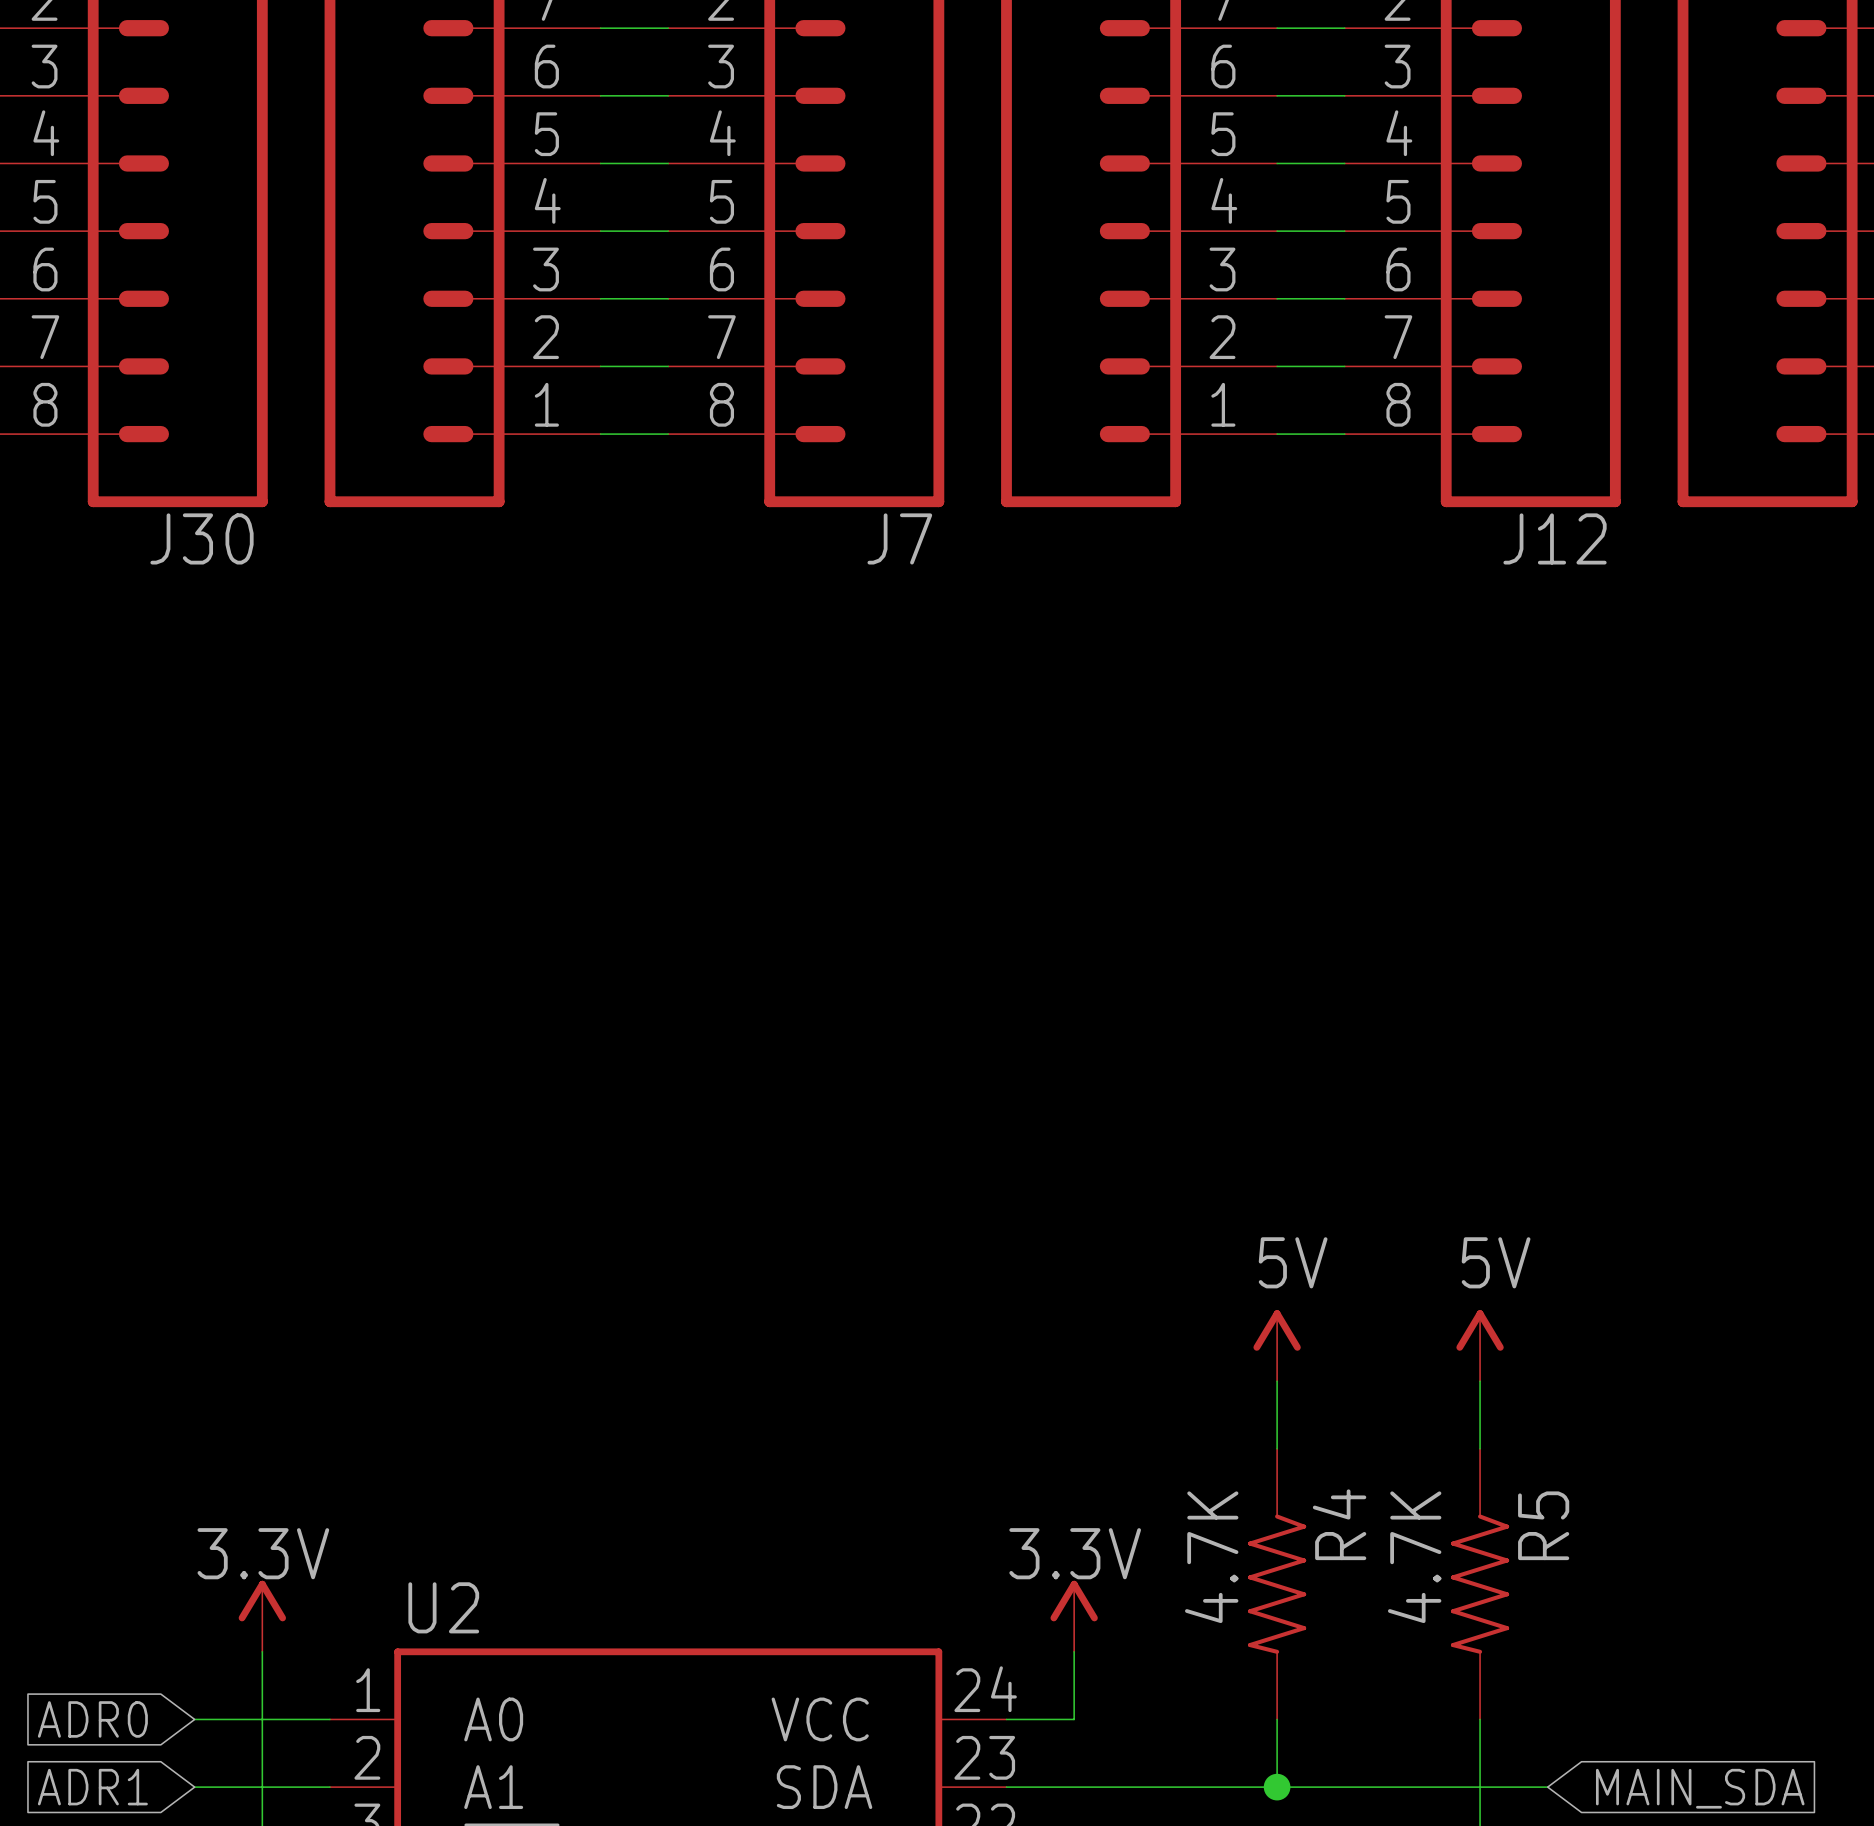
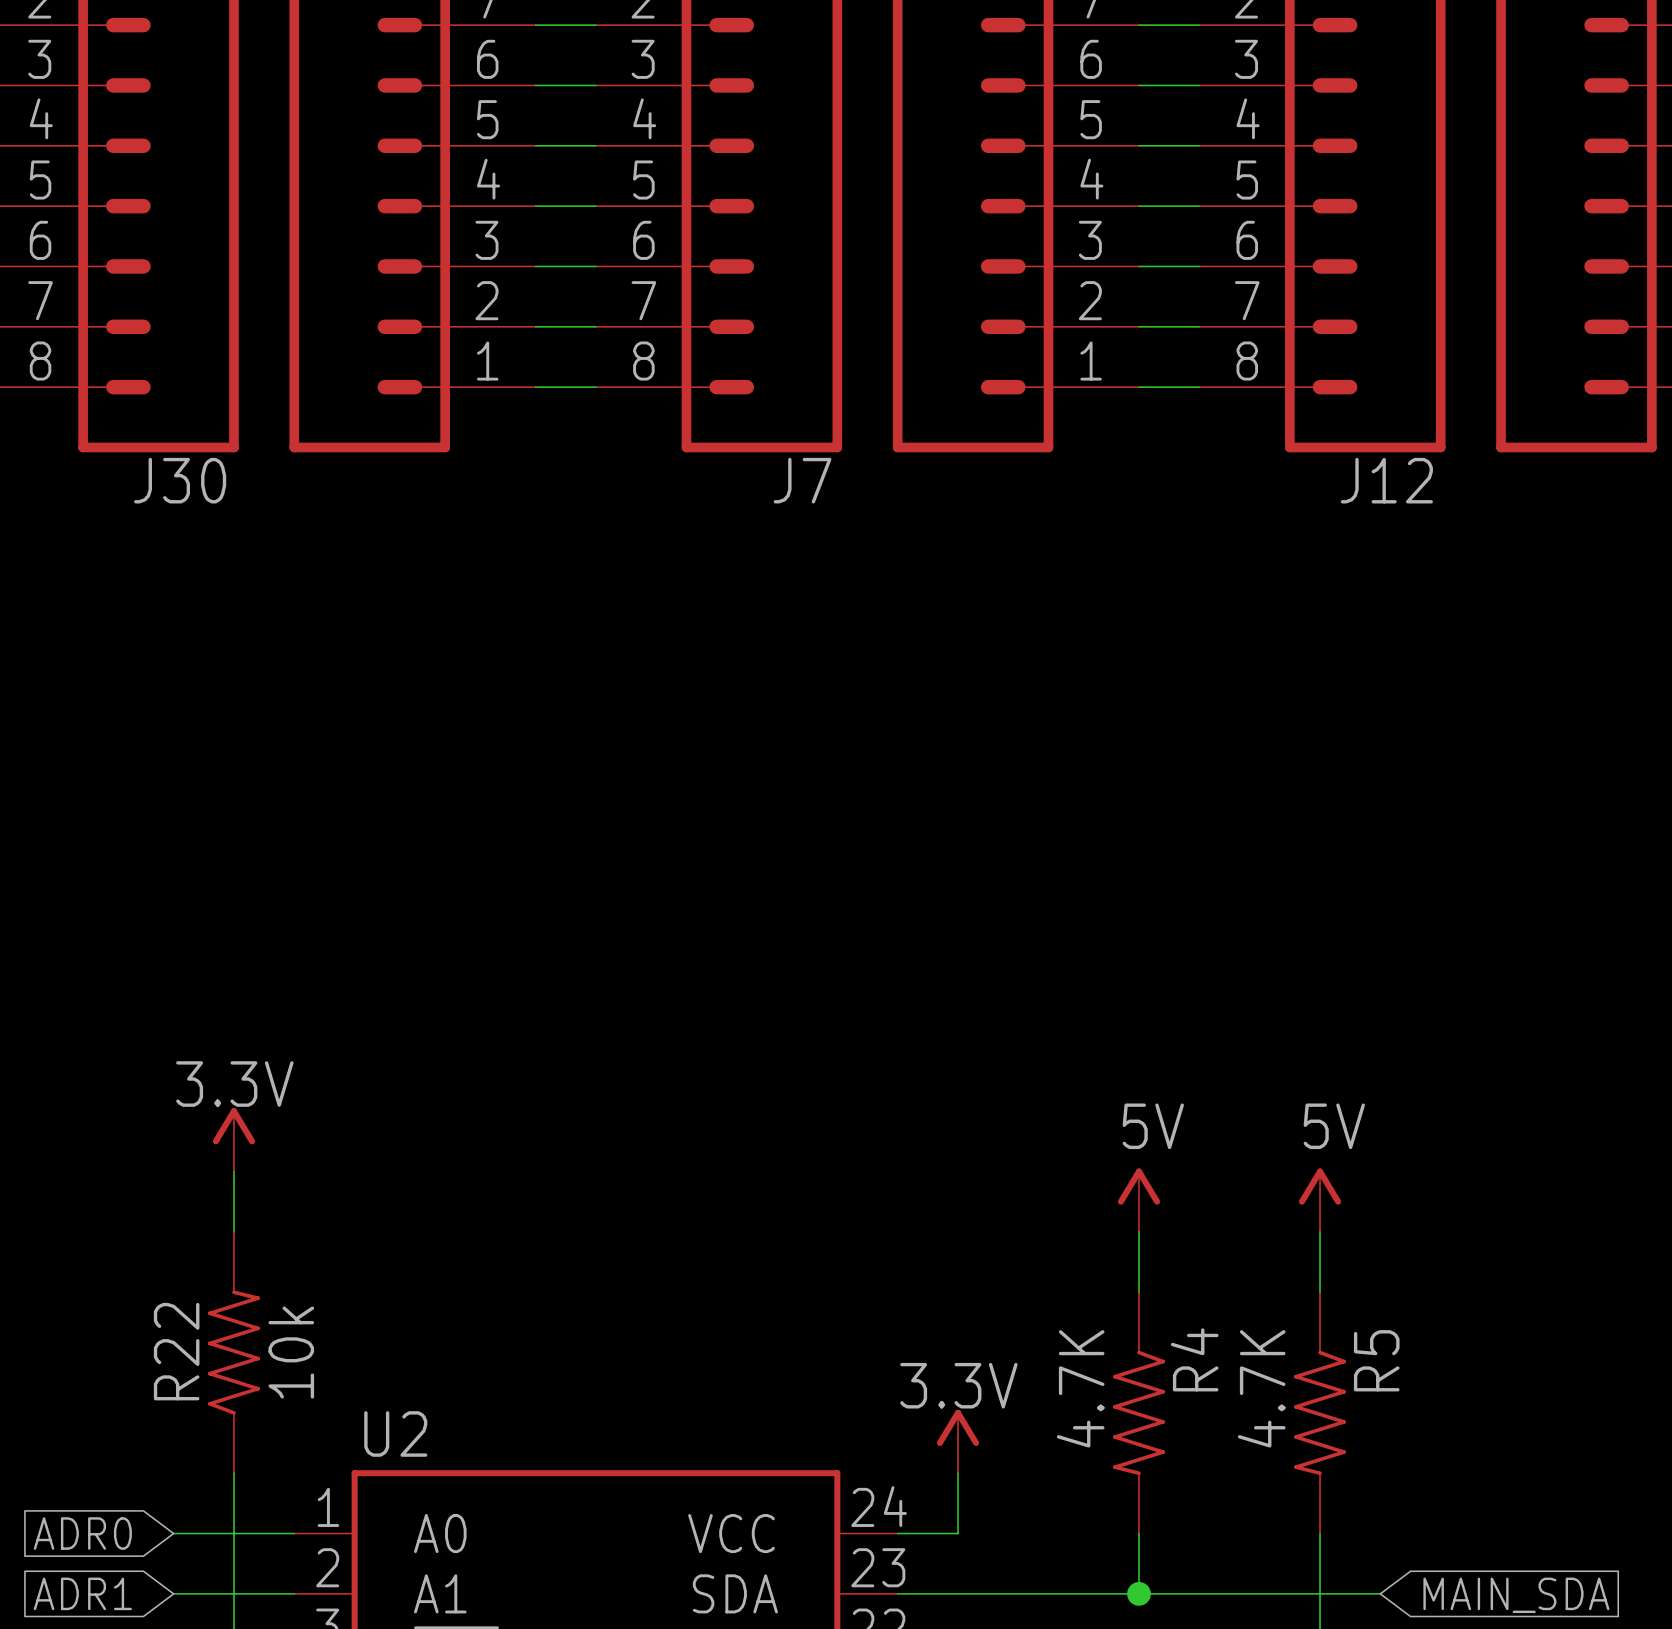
wire: none -> (233, 1171) (233, 1231)
R22: none -> 10k (233, 1352)
power symbol position: 3.3V (262, 1616) -> 3.3V (233, 1139)

